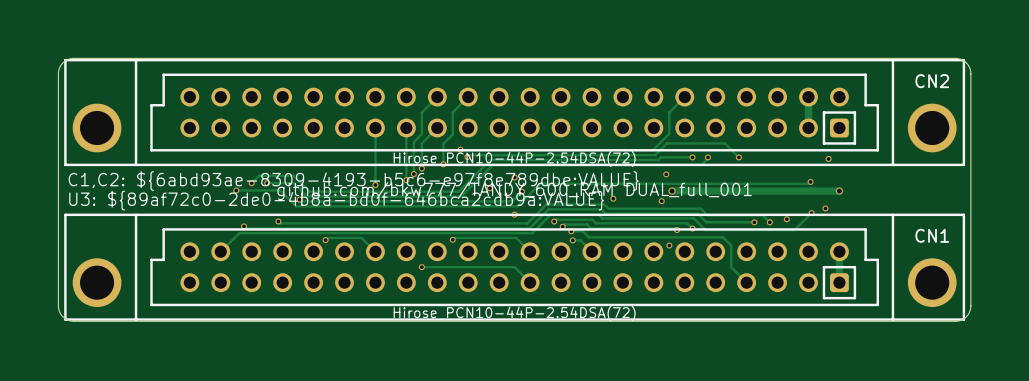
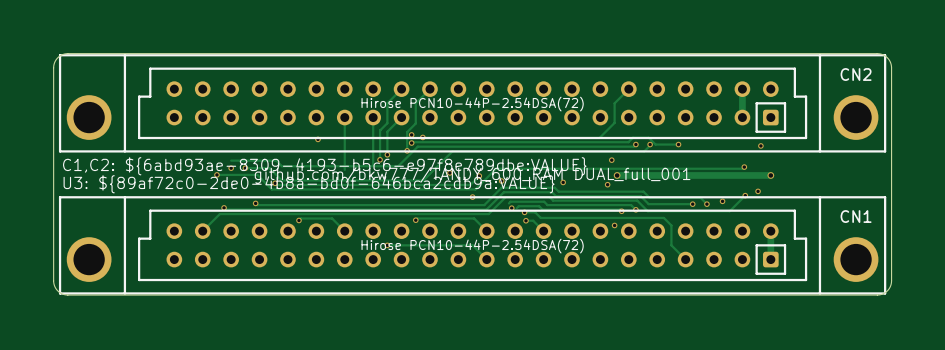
CN2 footprint: [64, 58, 966, 167] -> [58, 54, 887, 153]
via: none -> (411, 134)
via: none -> (317, 139)
via: none -> (411, 143)
track: (467, 156) (469, 155) (655, 155) (667, 143) (724, 143) (738, 157) -> (411, 143) (628, 142) (632, 137) (648, 137) (655, 144) (678, 144)
via: (467, 156) -> none
track: (692, 157) (660, 157) (658, 160) (490, 160) (458, 191) (309, 191) (293, 175) (259, 175) (251, 183) -> (635, 144) (633, 146) (417, 146) (398, 166) (281, 166) (276, 160) (231, 160)
via: (514, 177) -> none
via: (406, 180) -> none
via: (375, 184) -> none
via: none -> (501, 181)
CN1 footprint: [64, 213, 966, 321] -> [58, 196, 887, 295]
via: (554, 221) -> none
via: none -> (511, 208)
via: (562, 226) -> none

